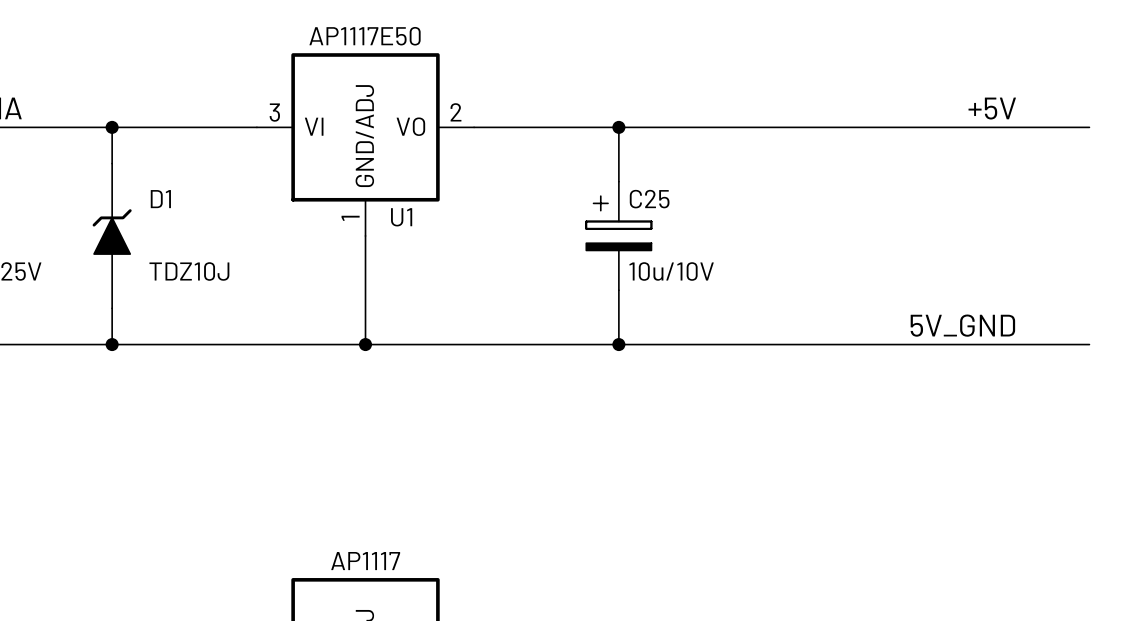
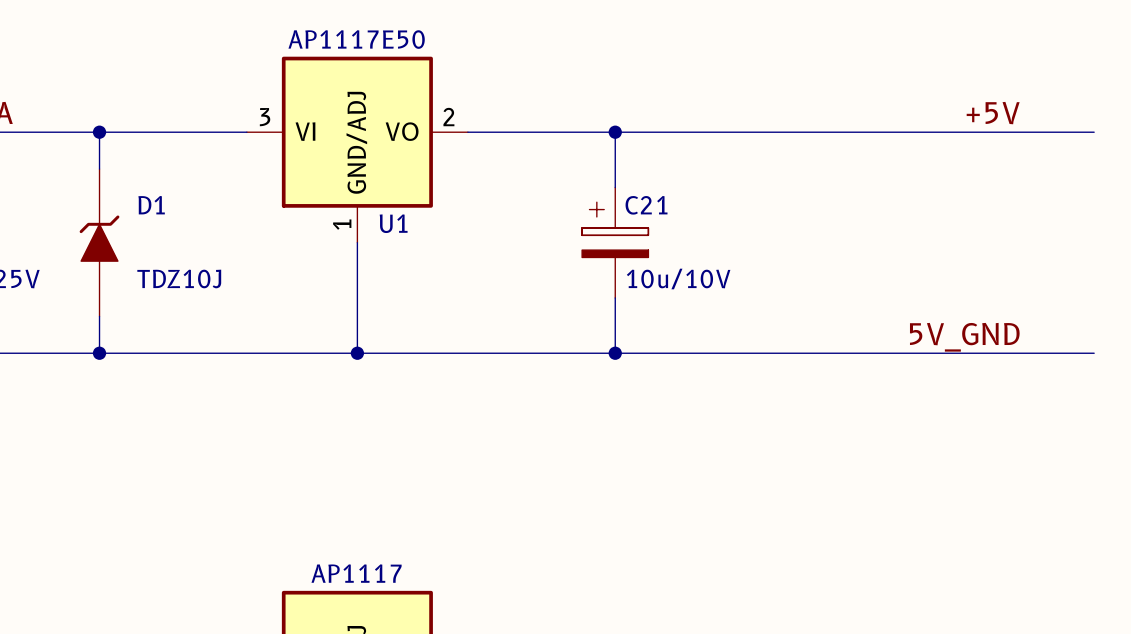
C25 name: C25 (649, 199) -> C21 (646, 205)

